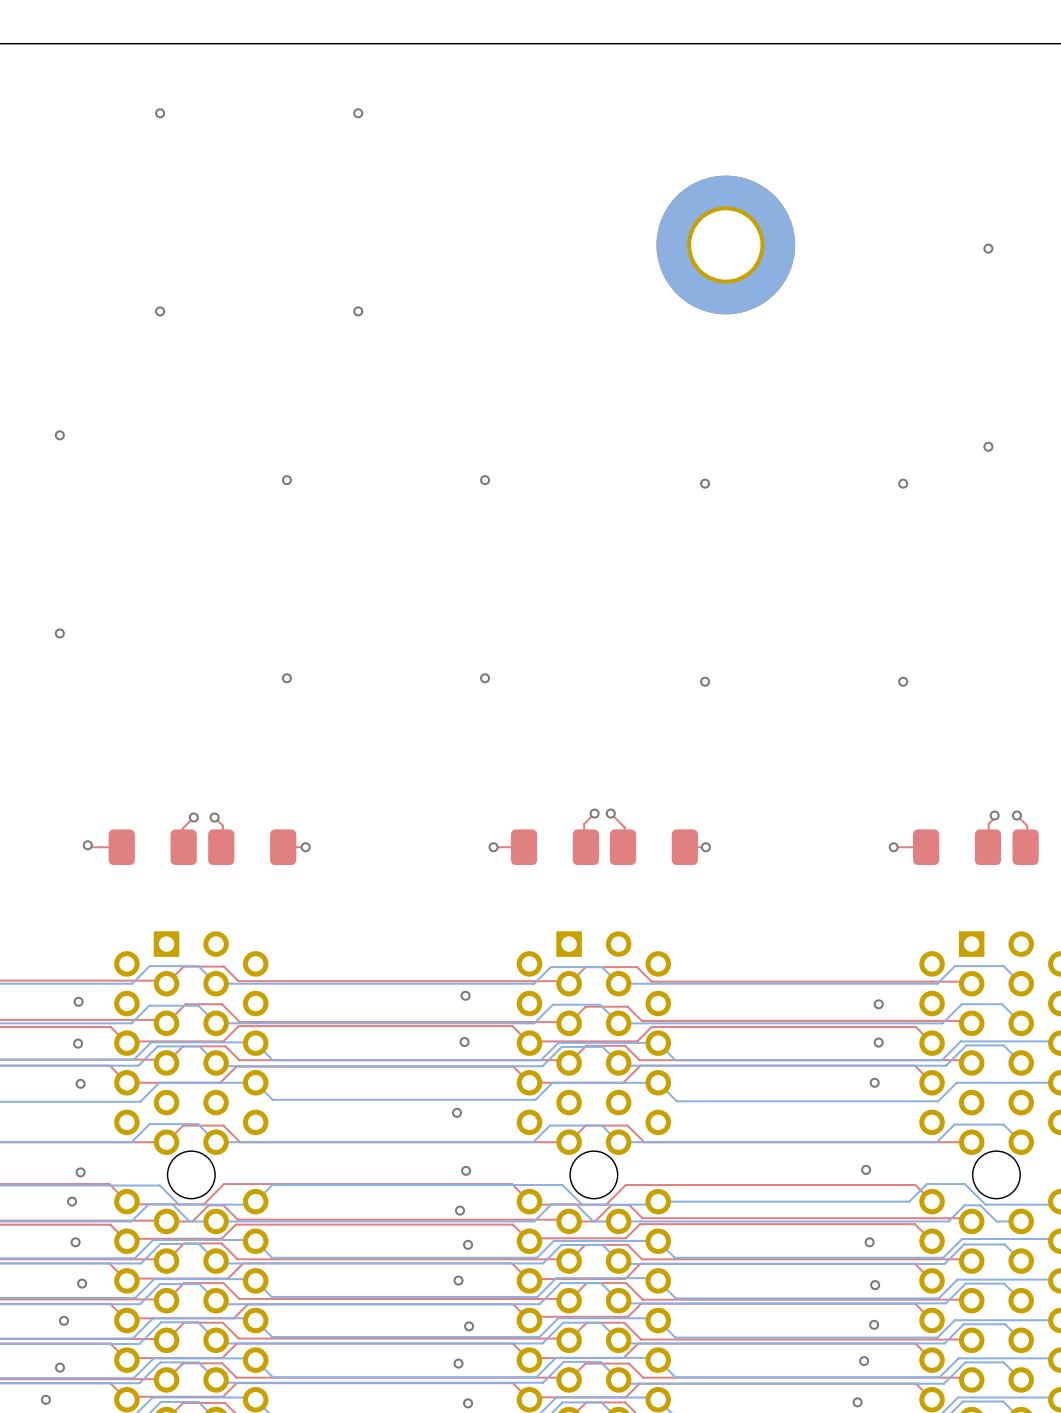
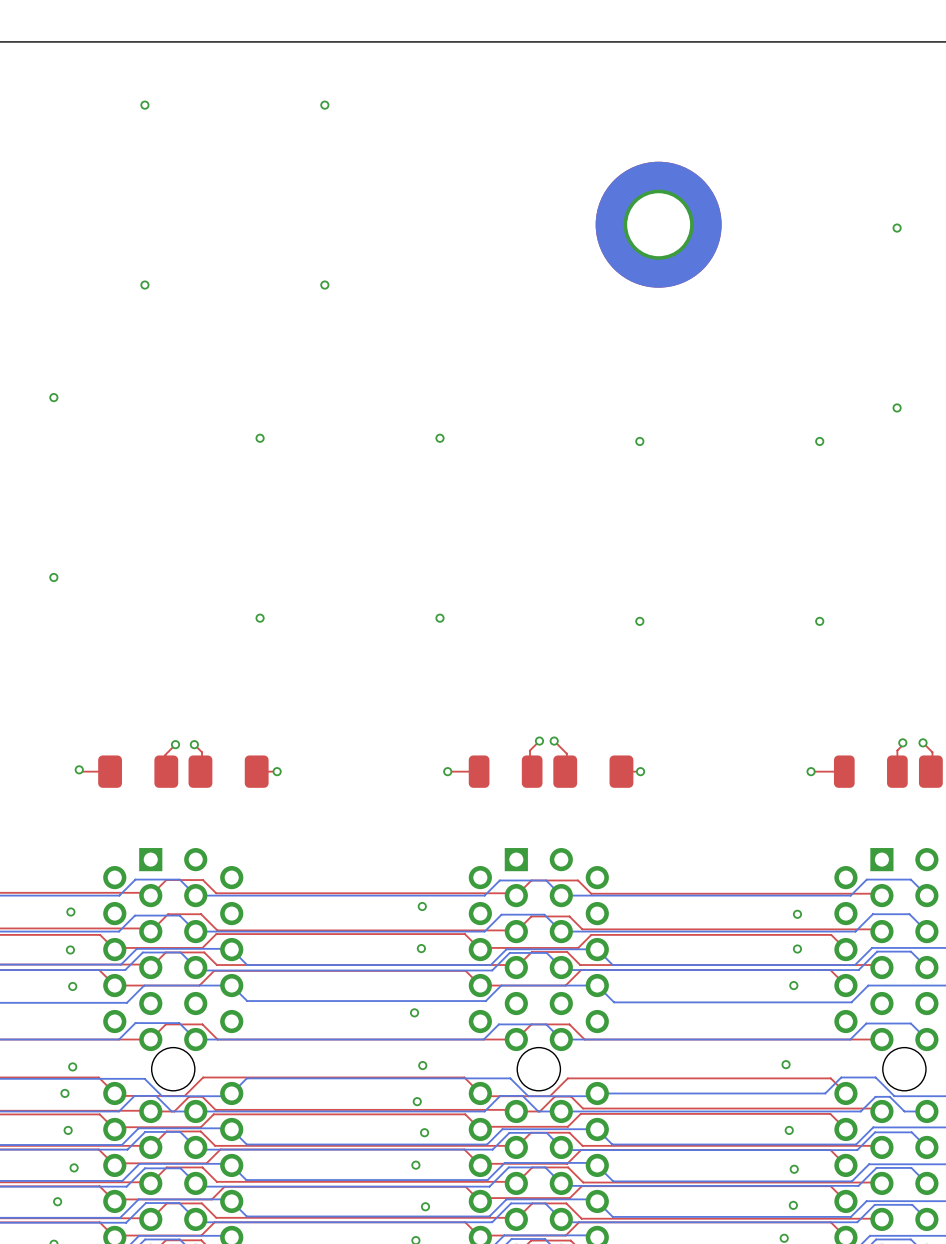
part footprint: [510, 829, 600, 866] -> [468, 755, 543, 788]
part footprint: [912, 829, 1002, 866] -> [833, 755, 908, 788]

